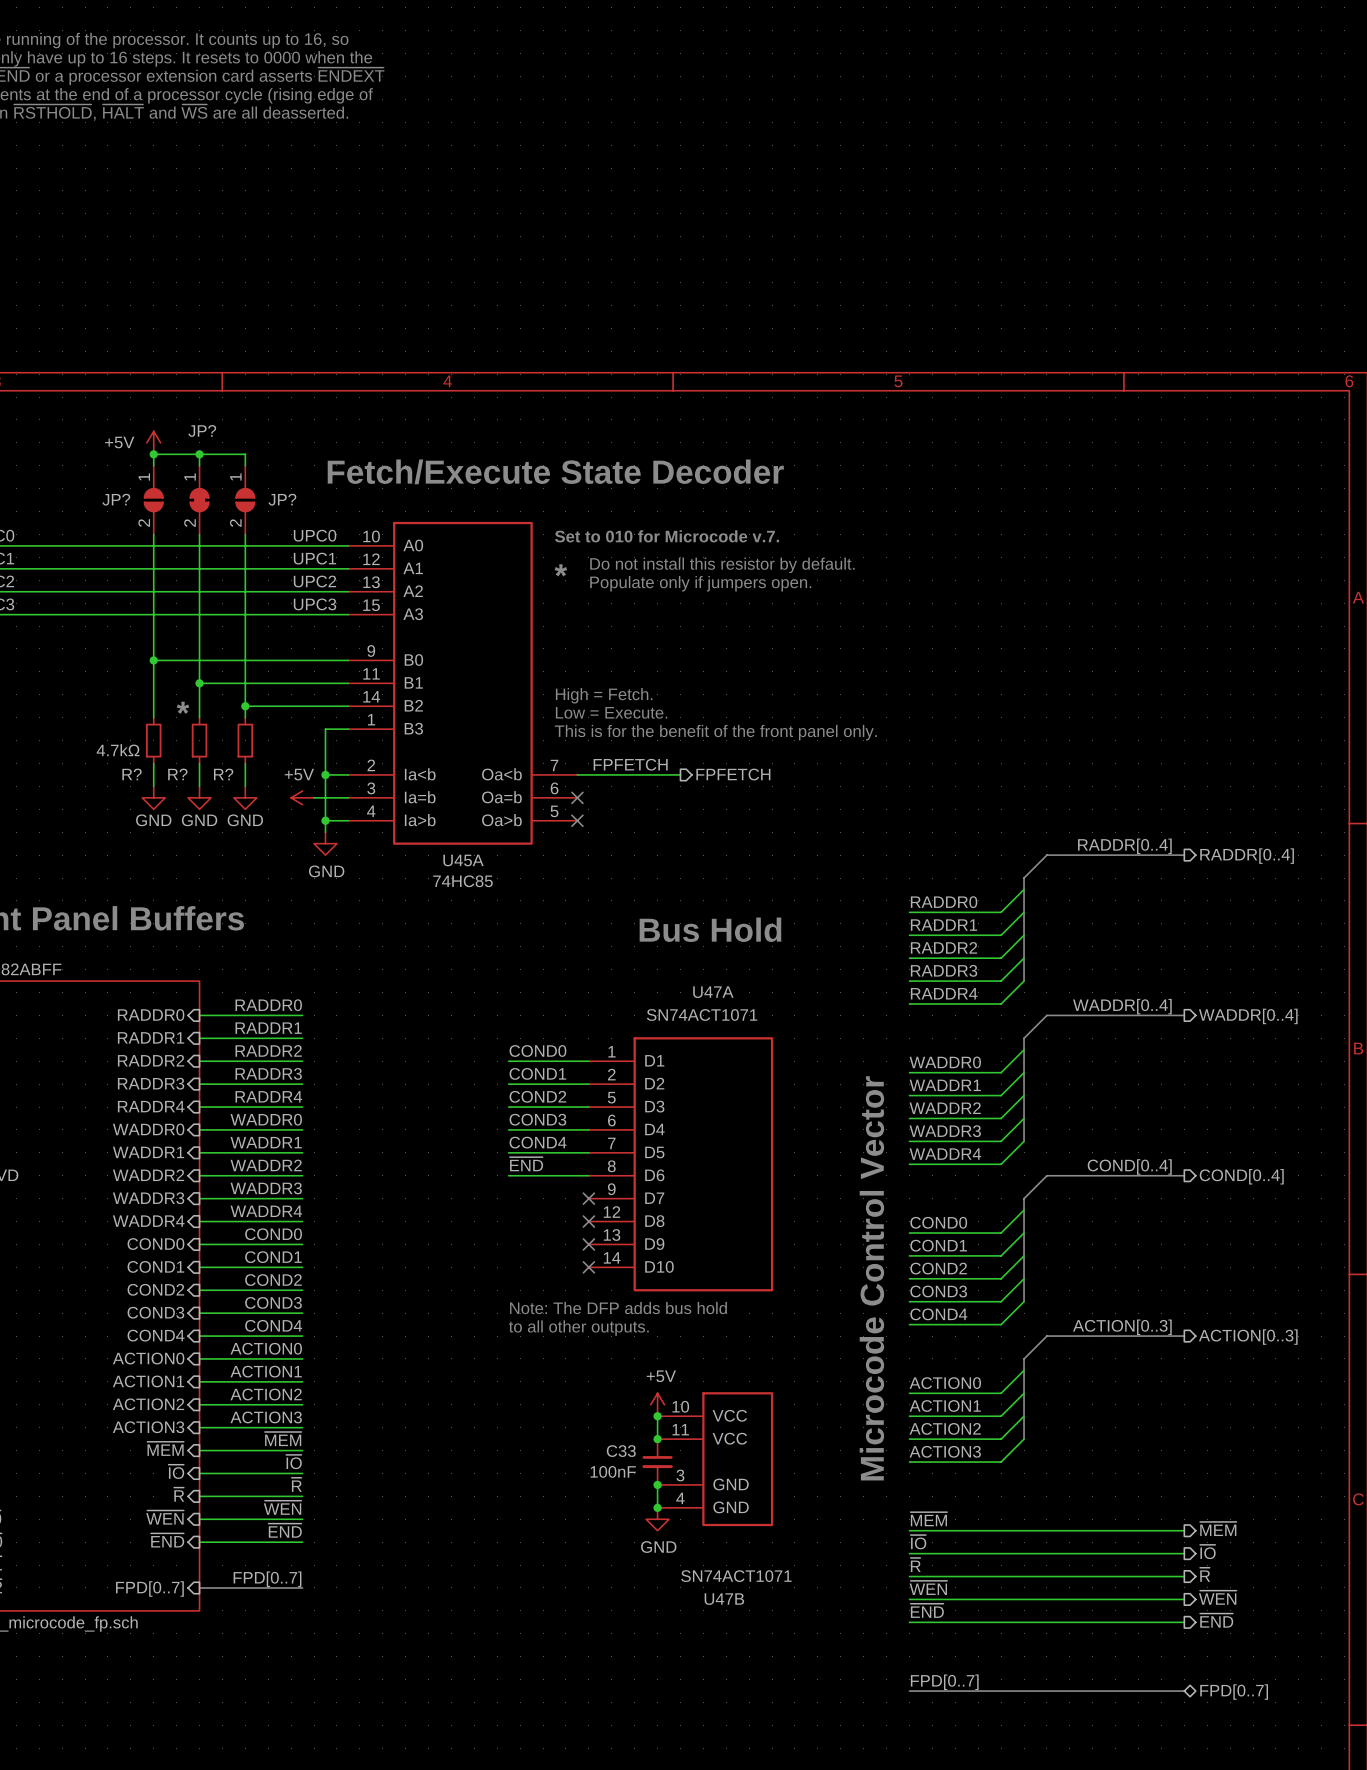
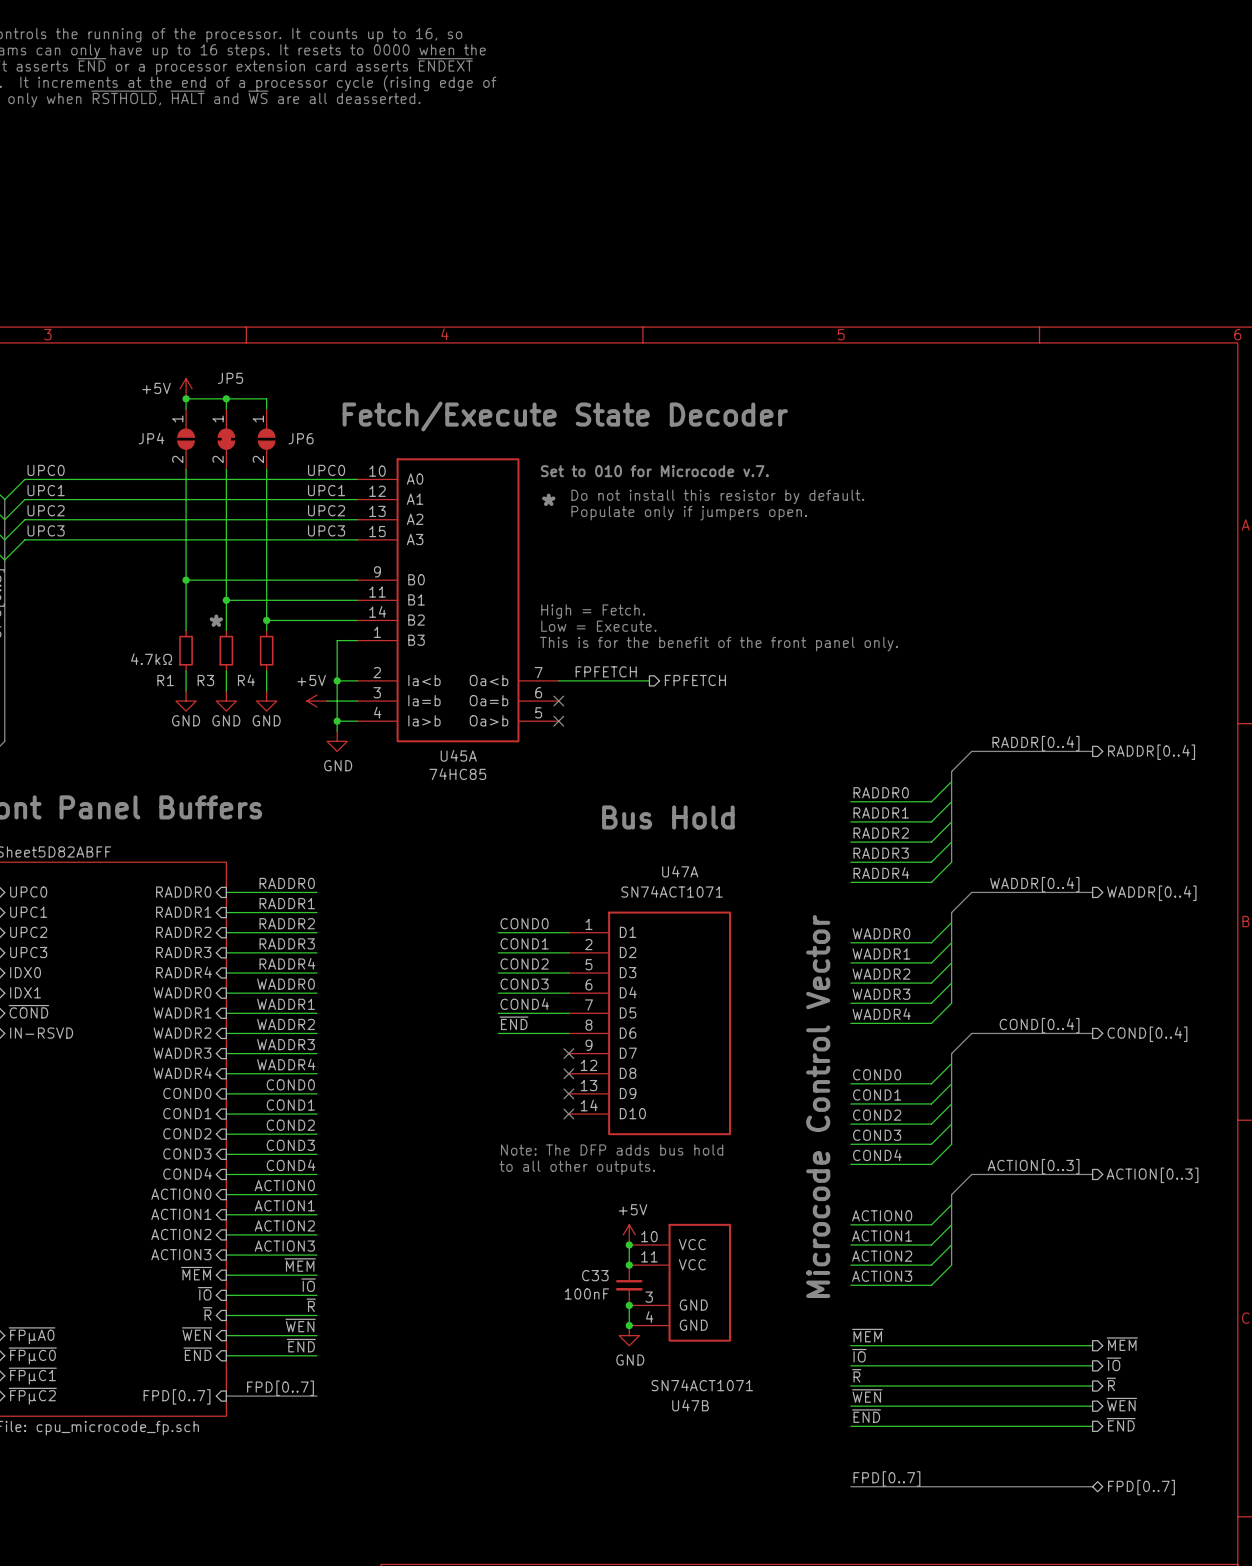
JP? name: JP? (202, 430) -> JP5 (230, 378)
JP? name: JP? (116, 499) -> JP4 (151, 438)
JP? name: JP? (282, 499) -> JP6 (301, 438)
R? name: R? (132, 774) -> R1 (165, 680)
R? name: R? (177, 774) -> R3 (205, 680)
R? name: R? (223, 774) -> R4 (246, 680)

